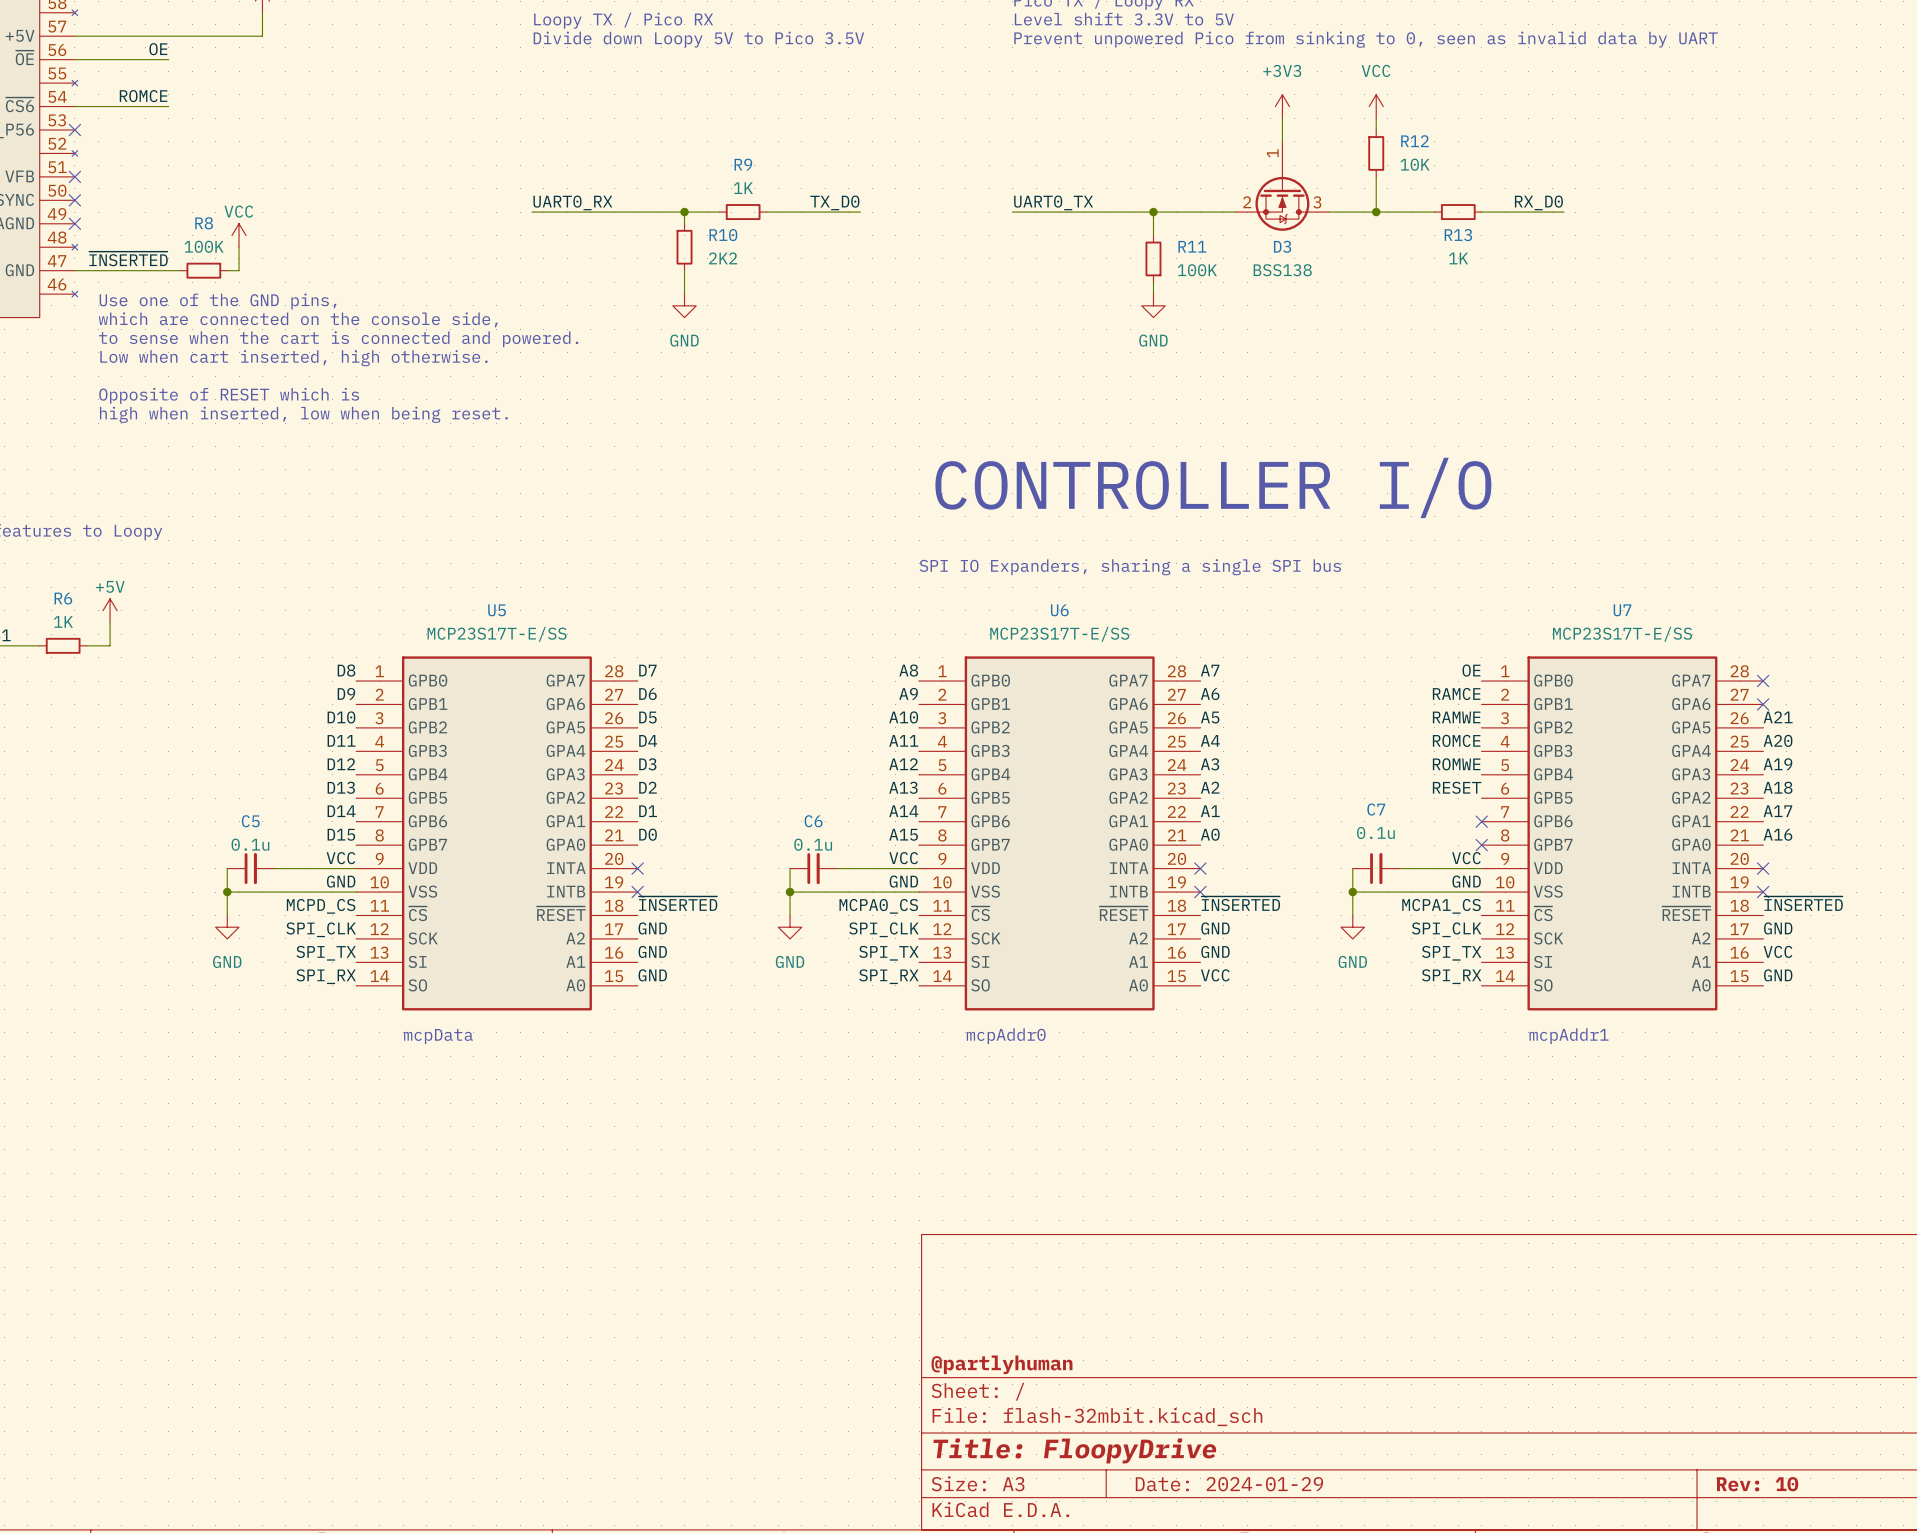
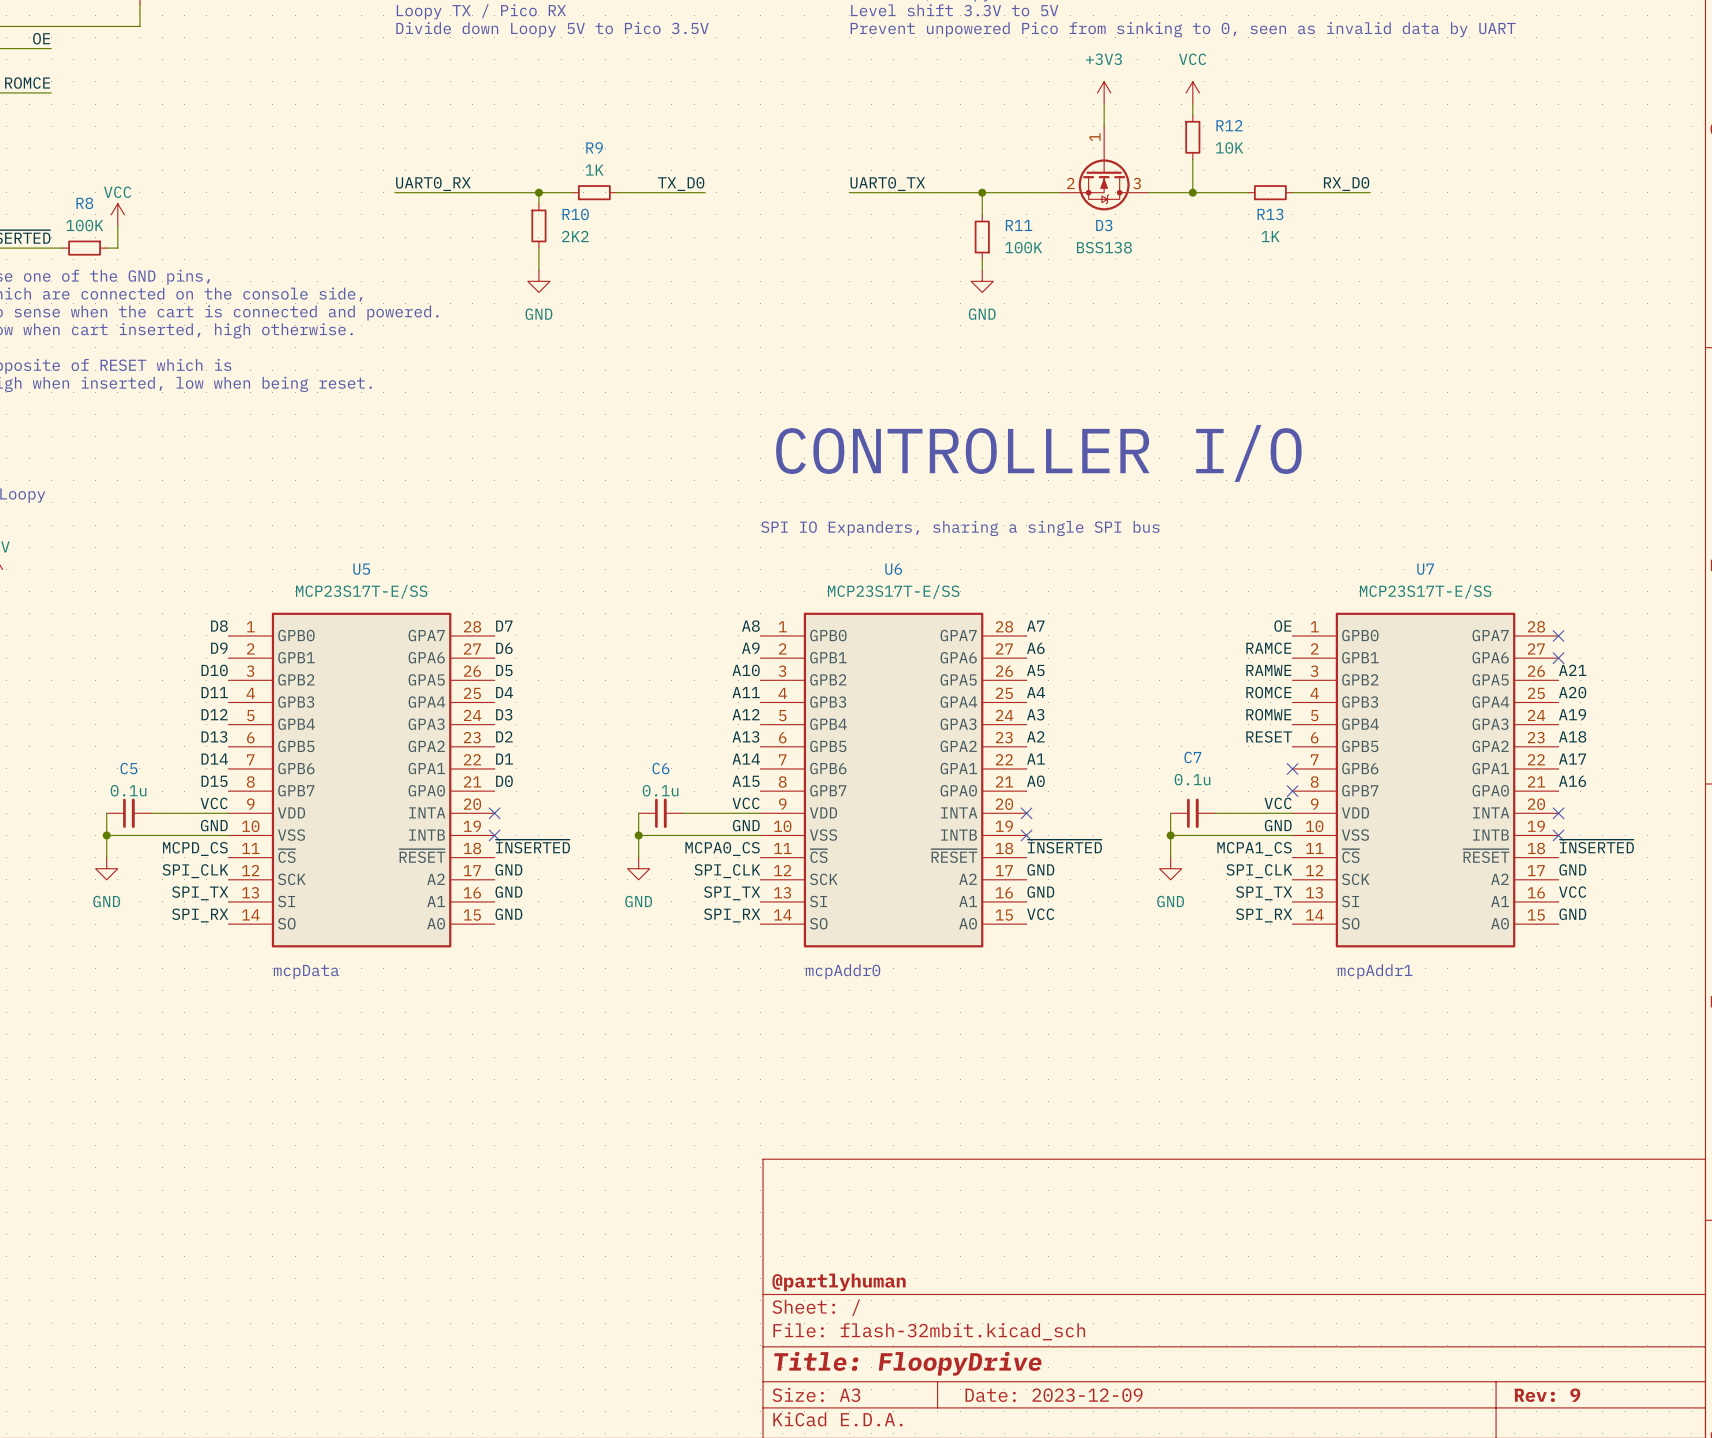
title block: Date: 2024-01-29 (1229, 1484) -> Date: 2023-12-09 (1054, 1395)
title block: Rev: 10 (1757, 1484) -> Rev: 9 (1547, 1395)

